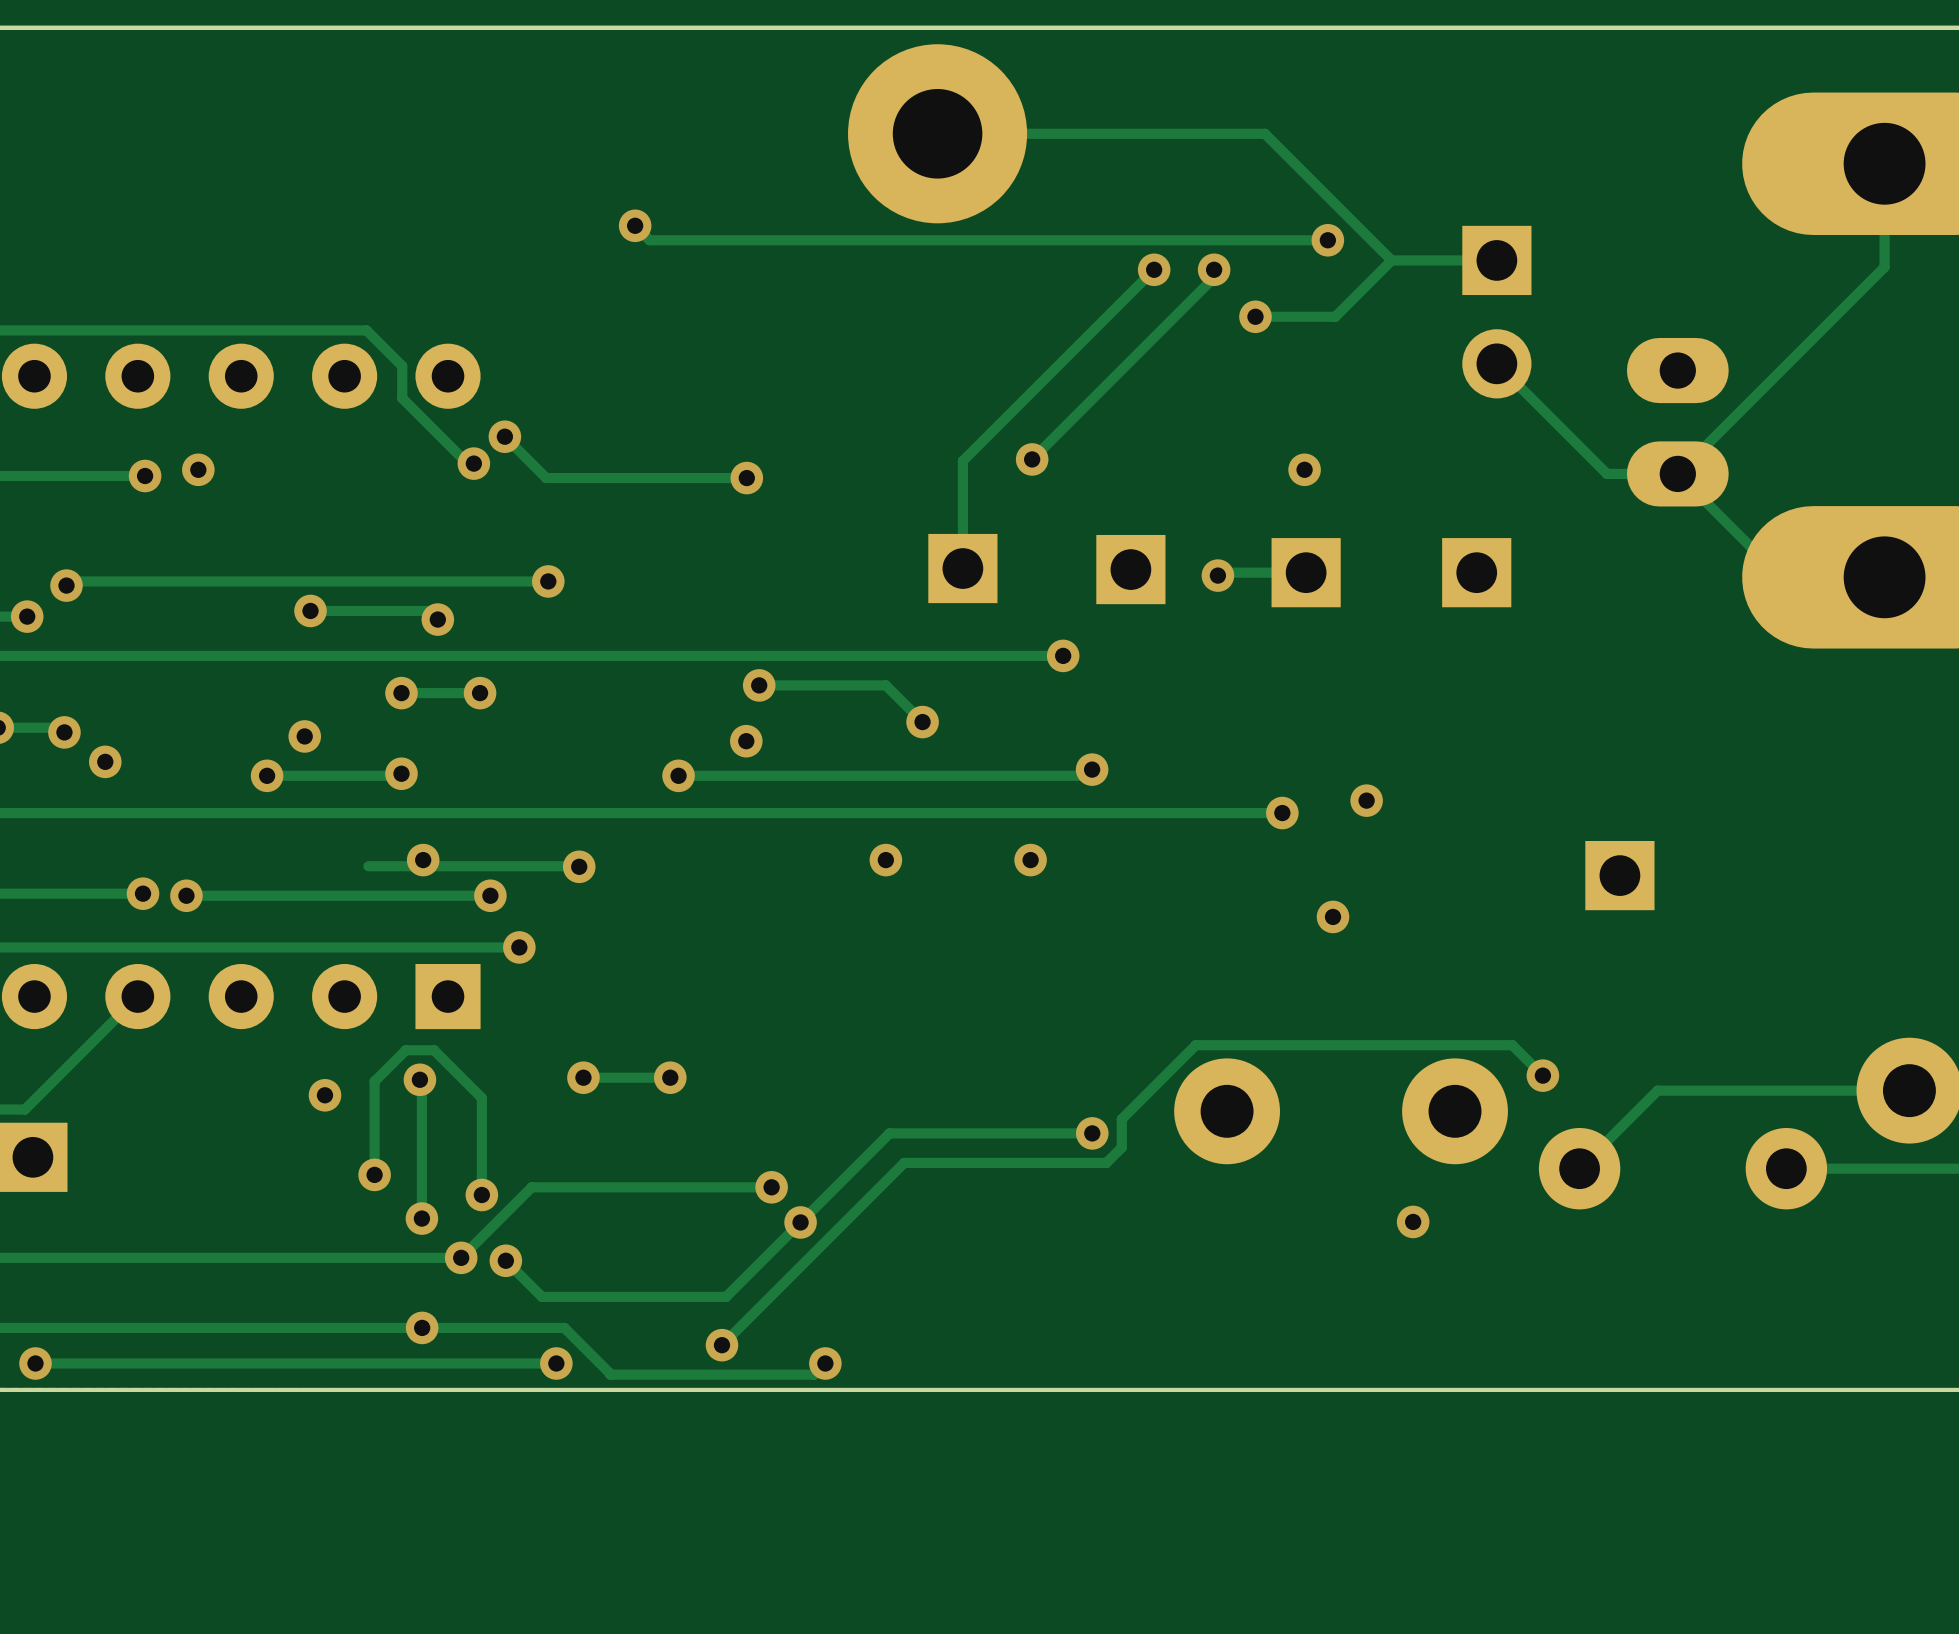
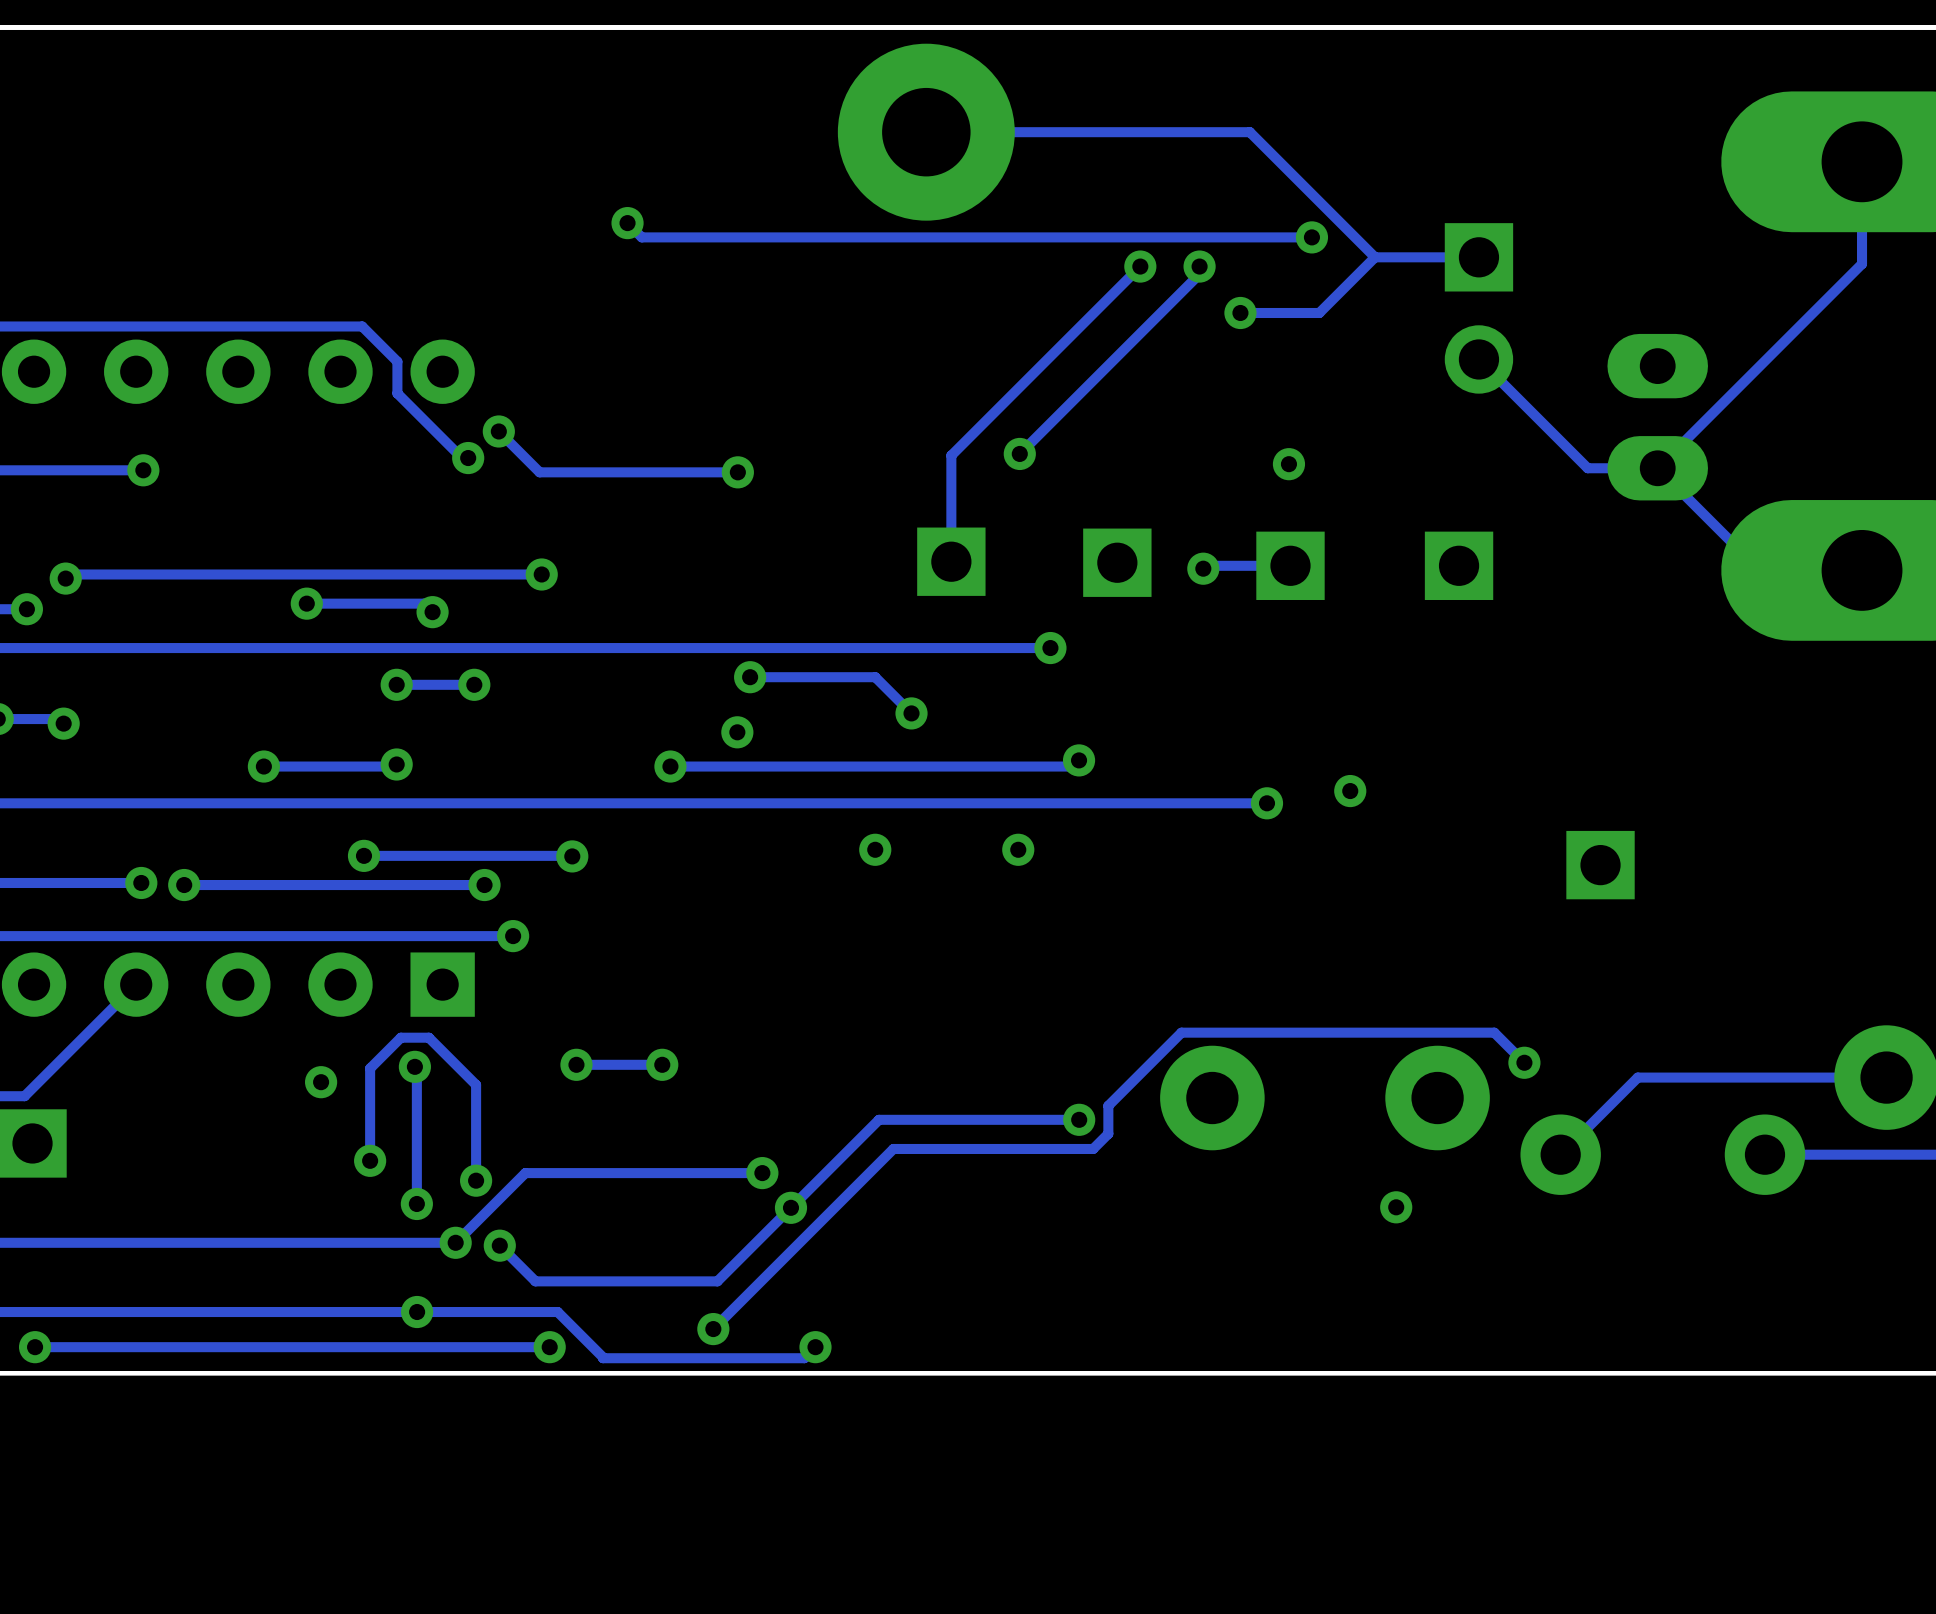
via: (198, 469) -> none
via: (304, 736) -> none
via: (105, 761) -> none
via position: (423, 860) -> (363, 855)
via: (1333, 916) -> none

